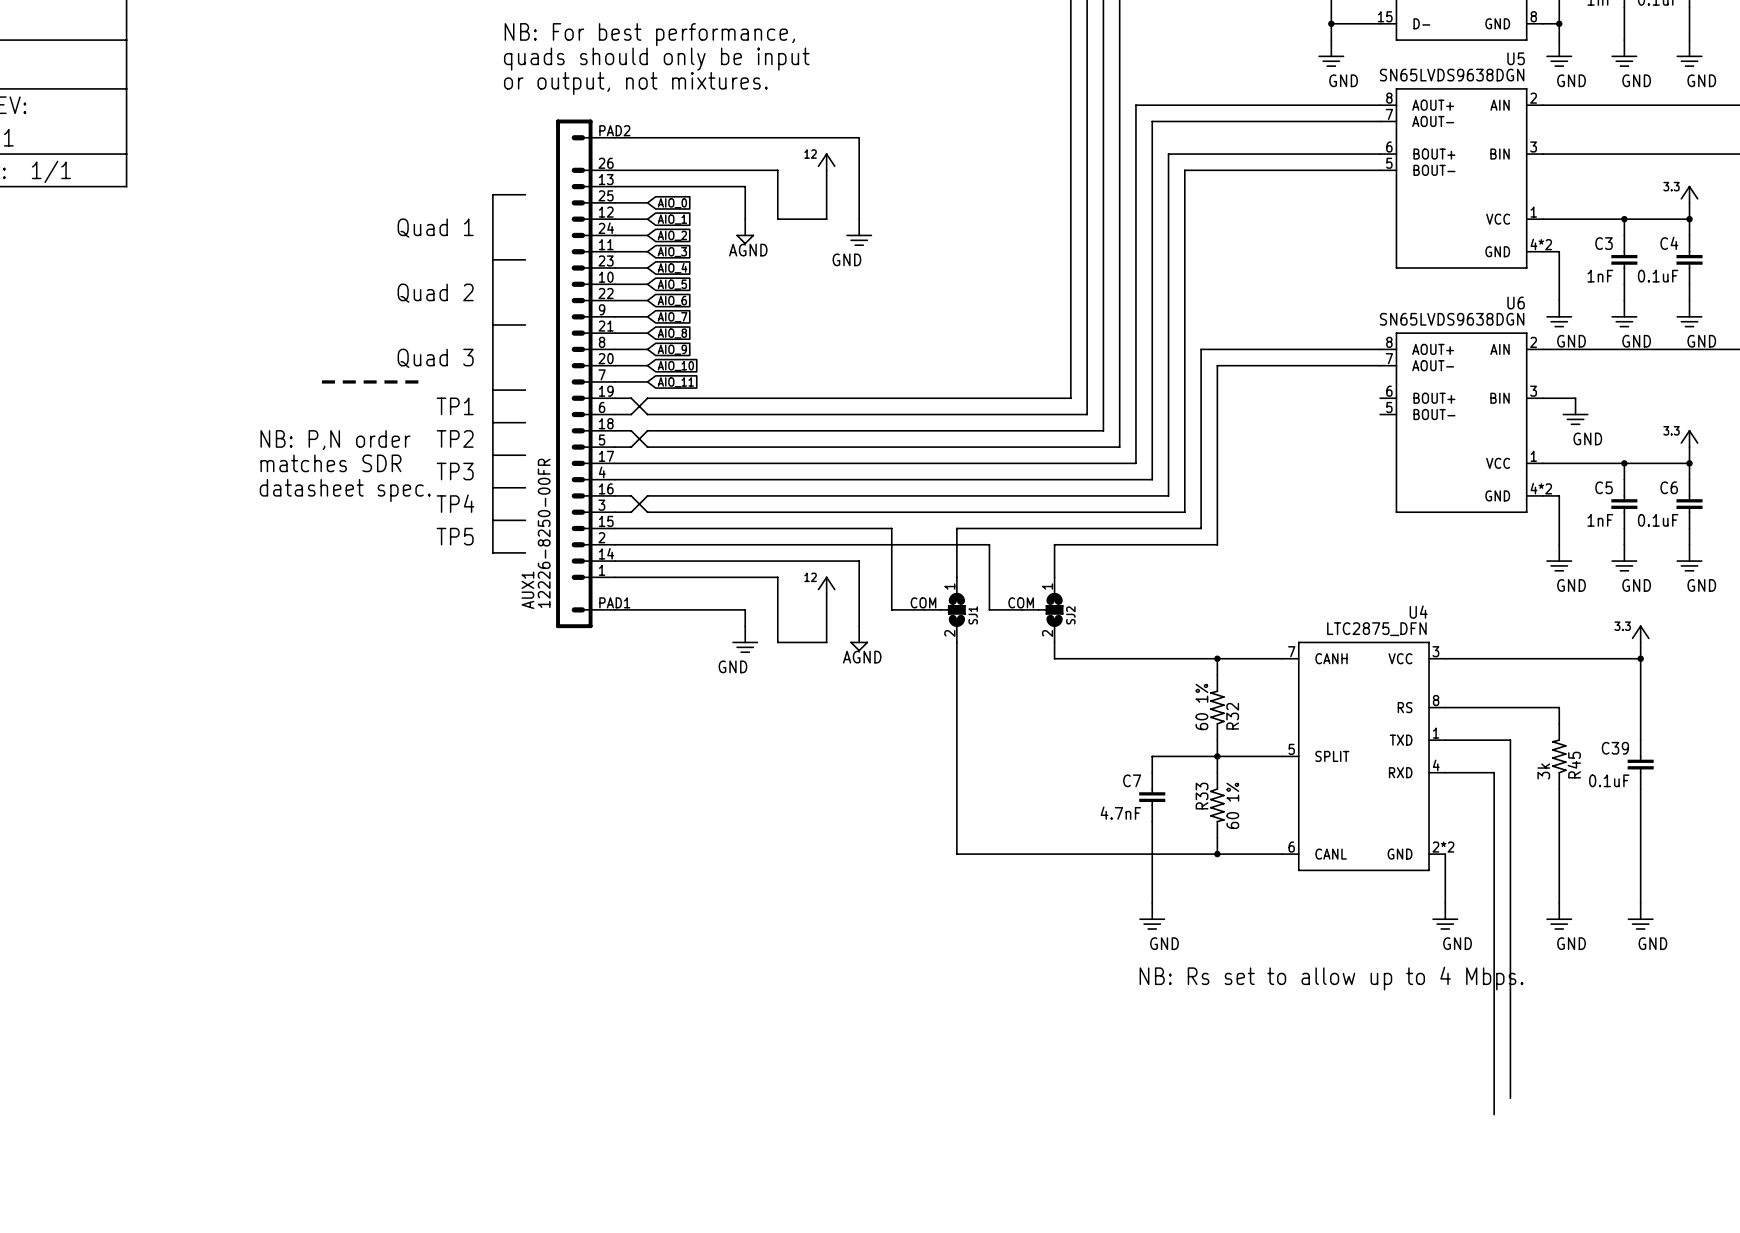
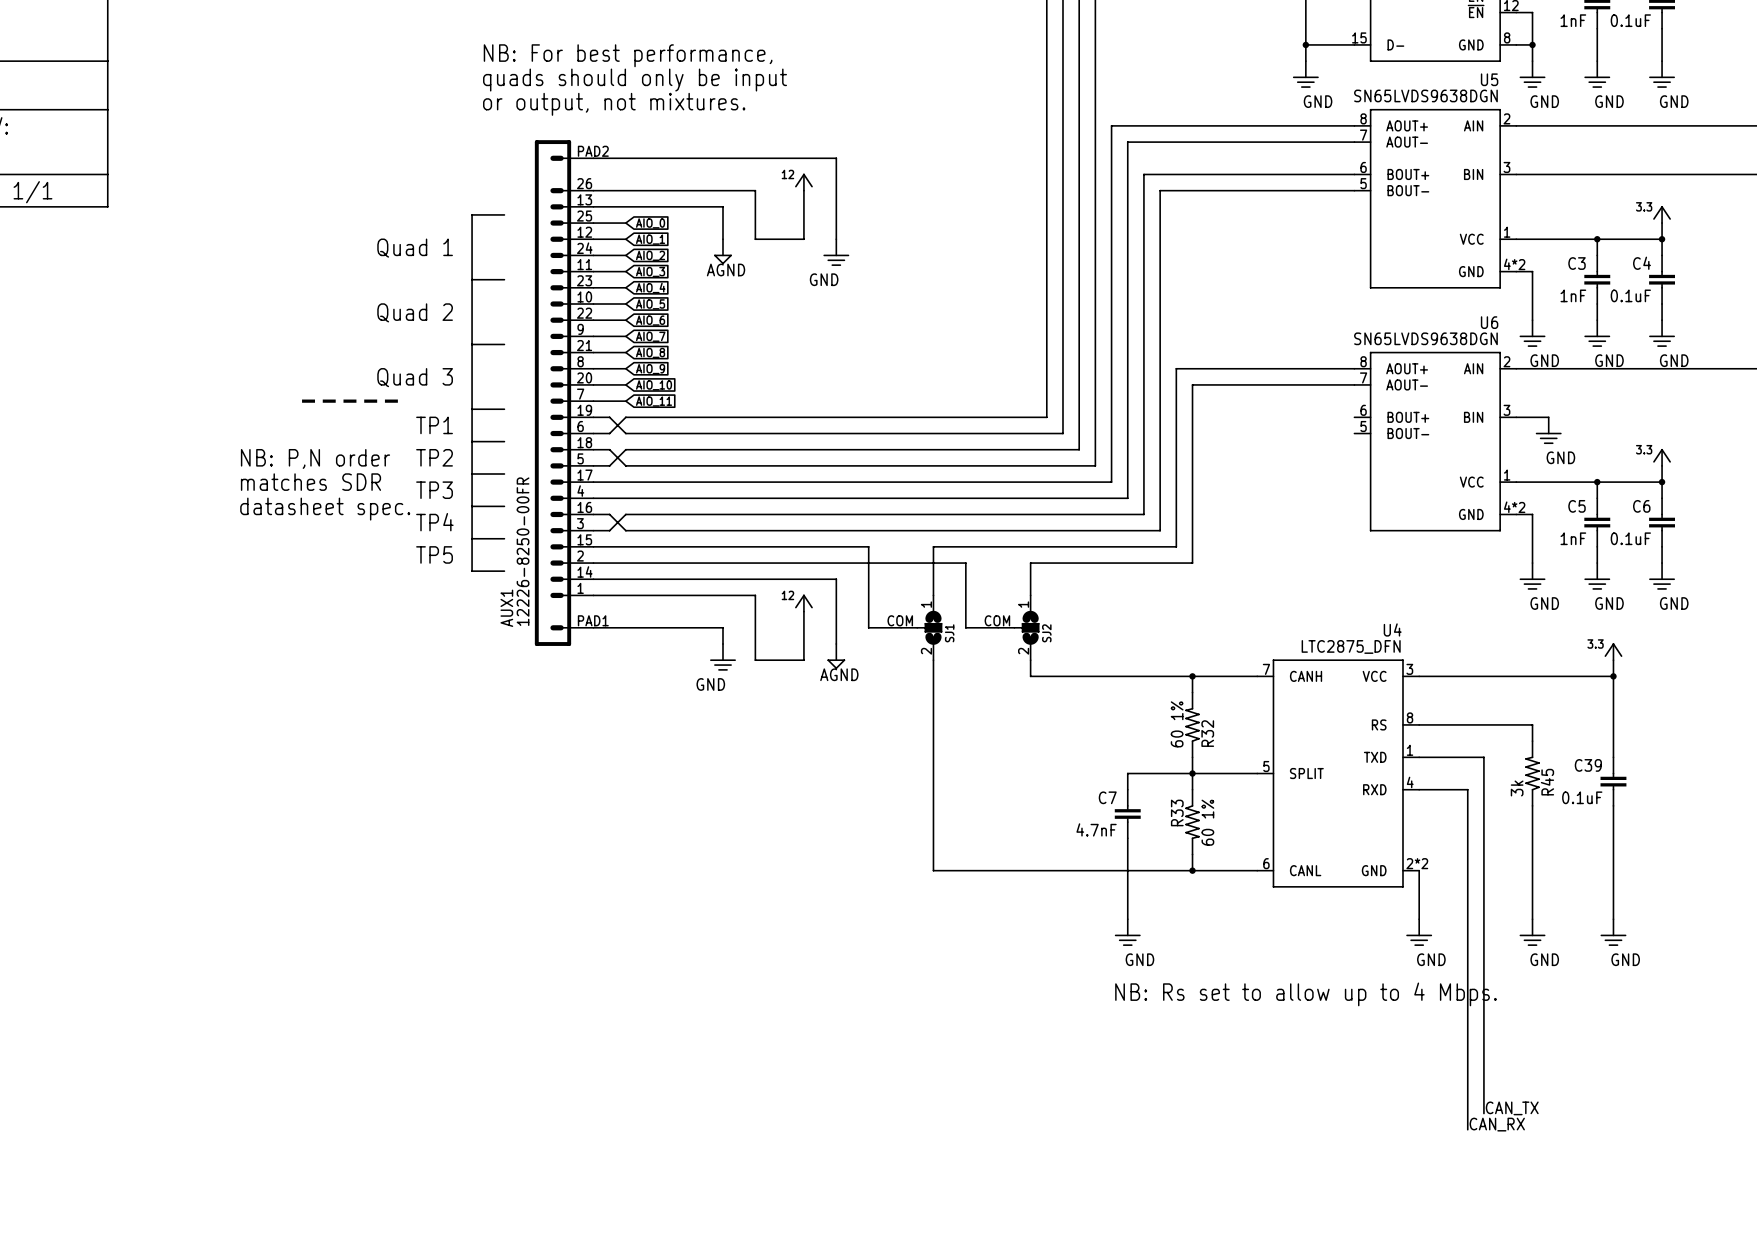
label: none -> CAN_TX (1512, 1108)
label: none -> CAN_RX (1497, 1124)

